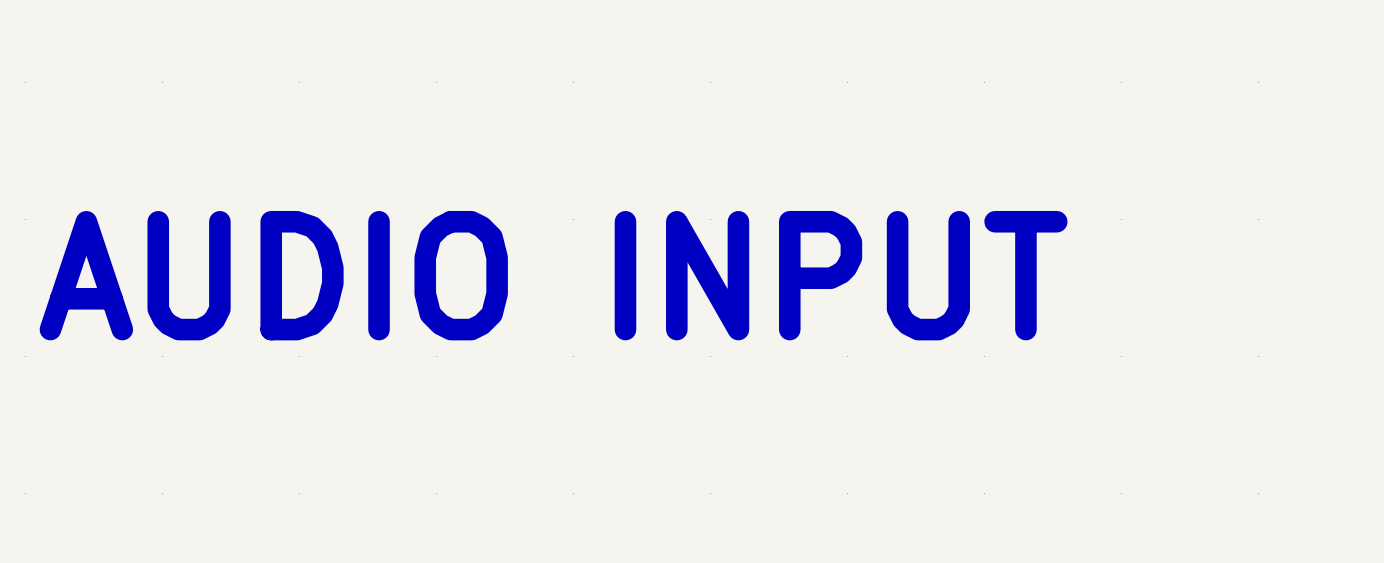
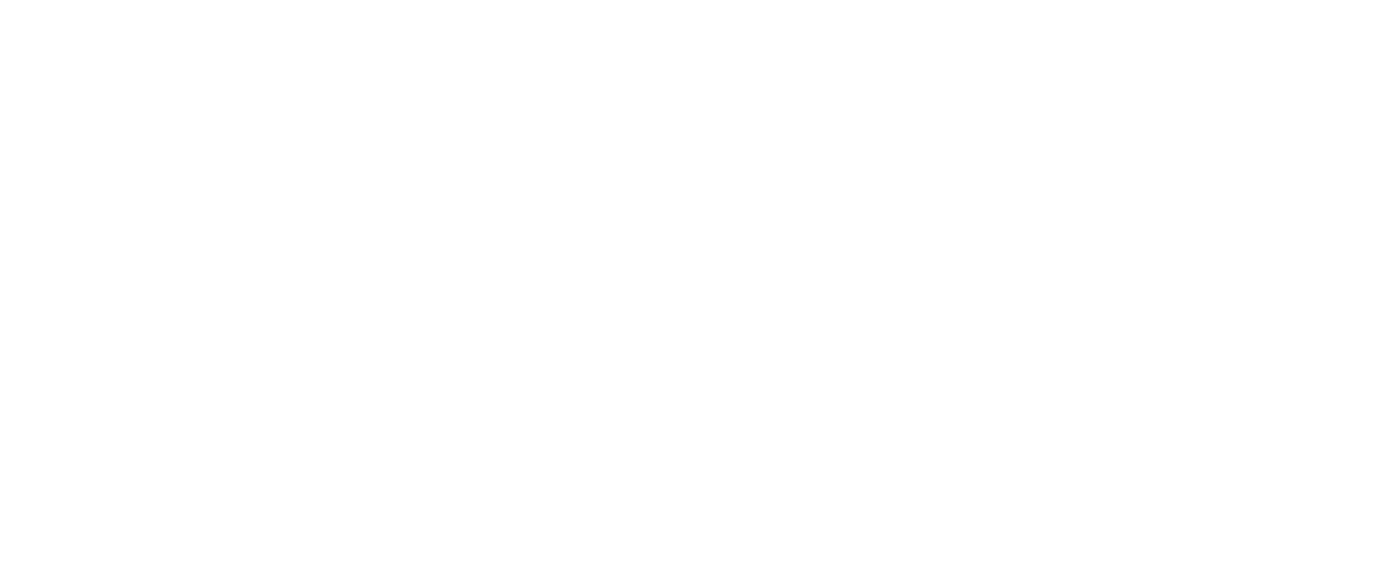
text: AUDIO INPUT (553, 275) -> none

